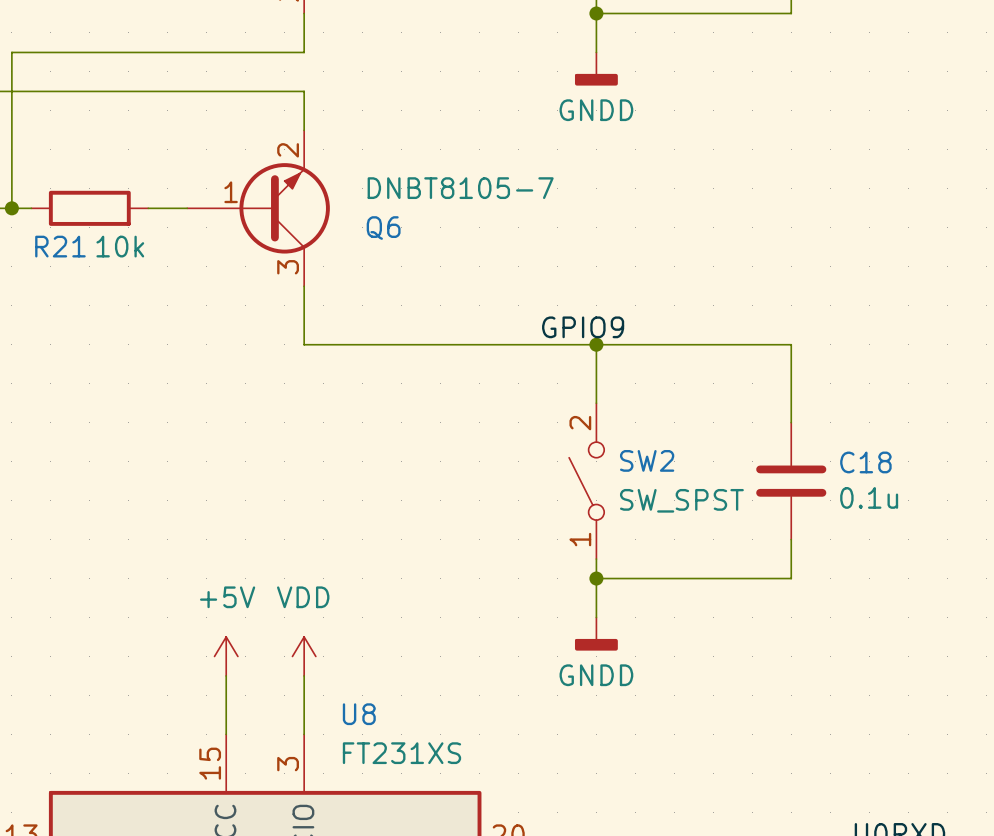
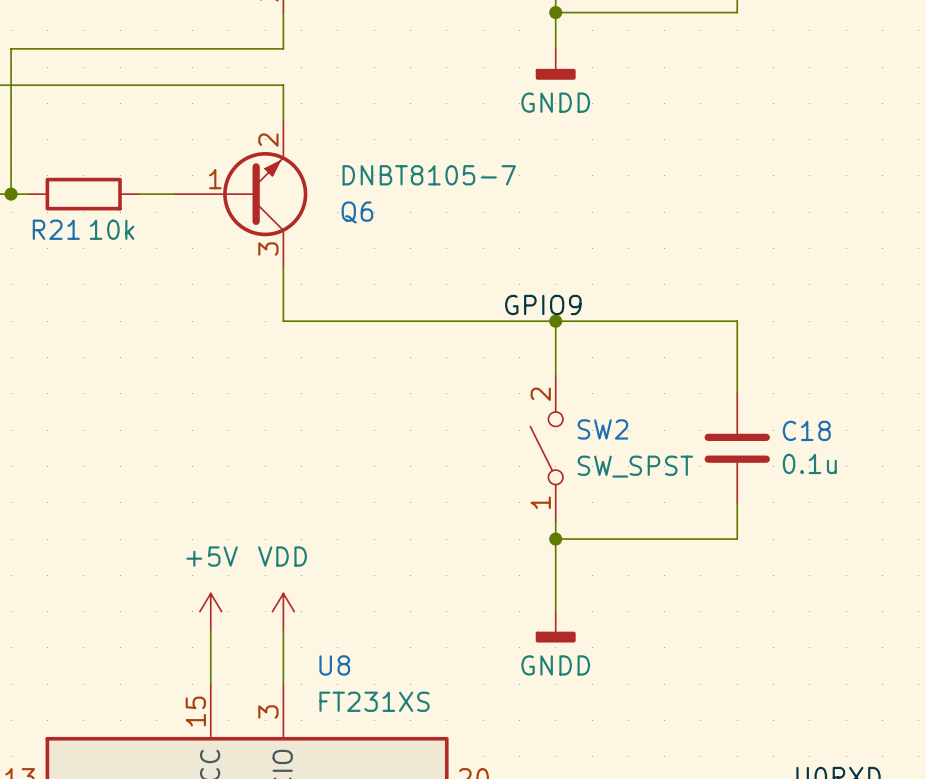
power symbol position: GNDD (596, 634) -> GNDD (555, 627)

